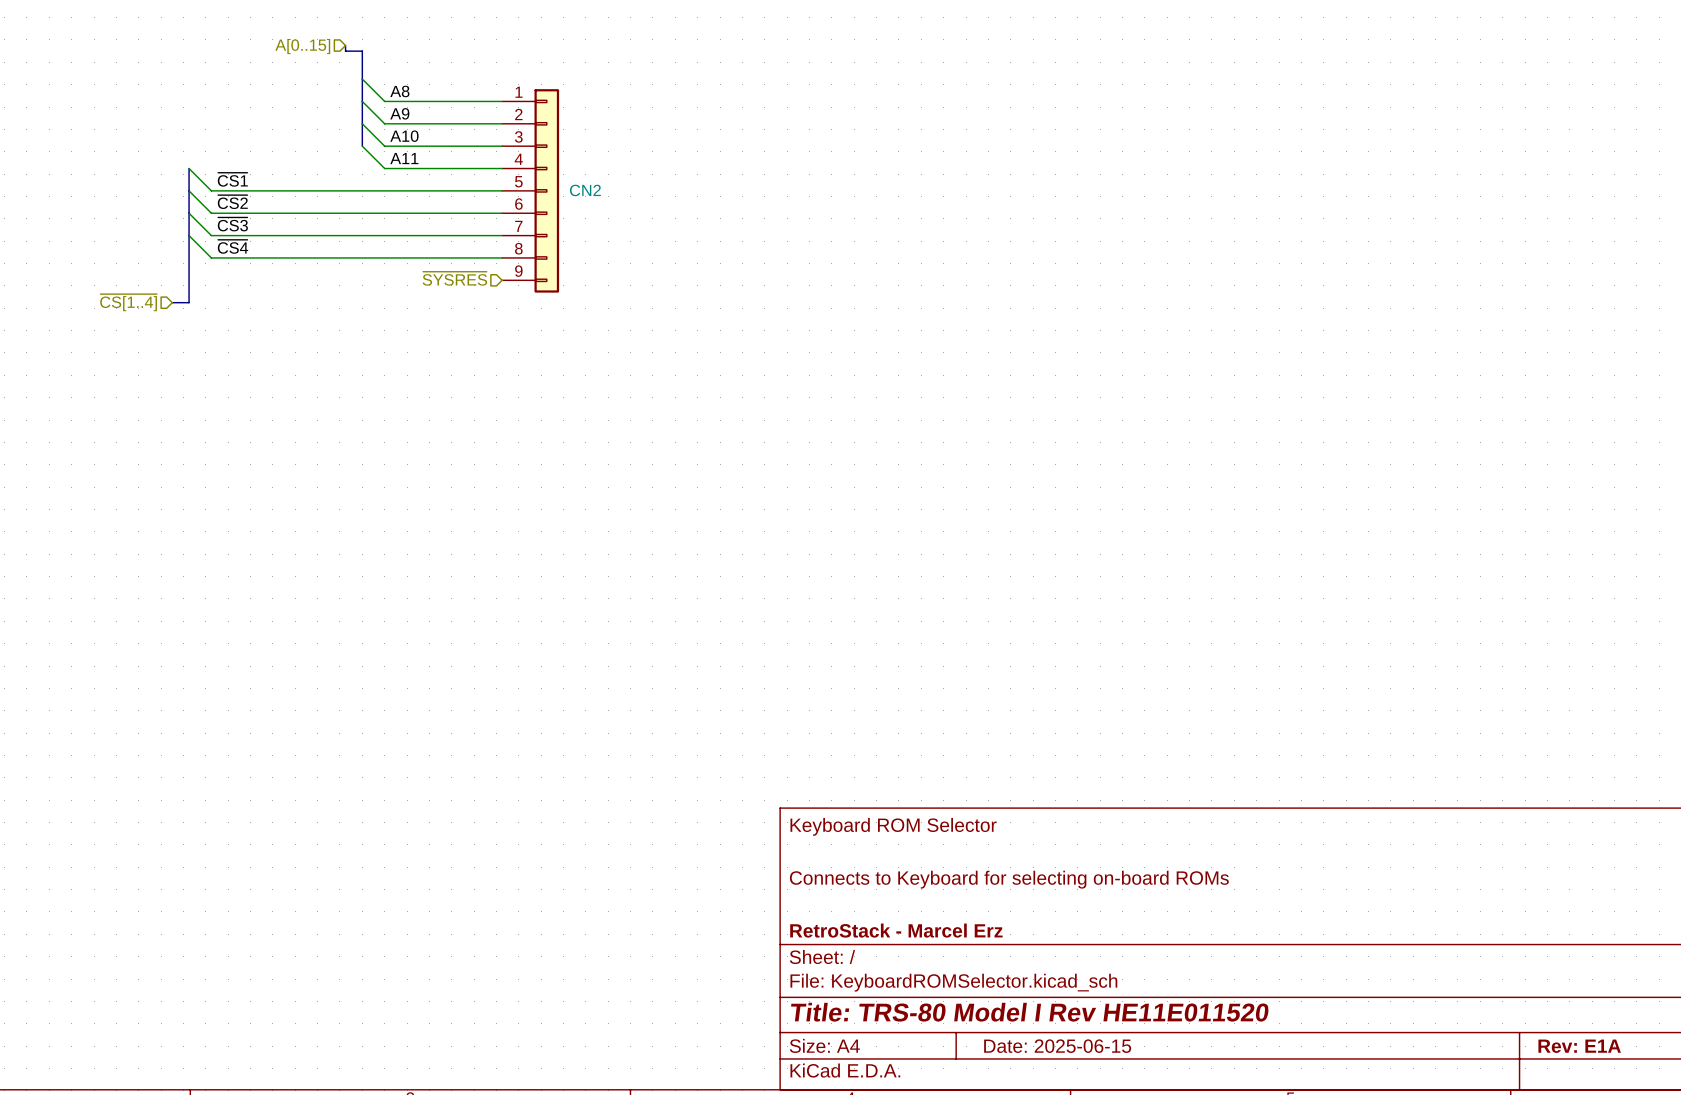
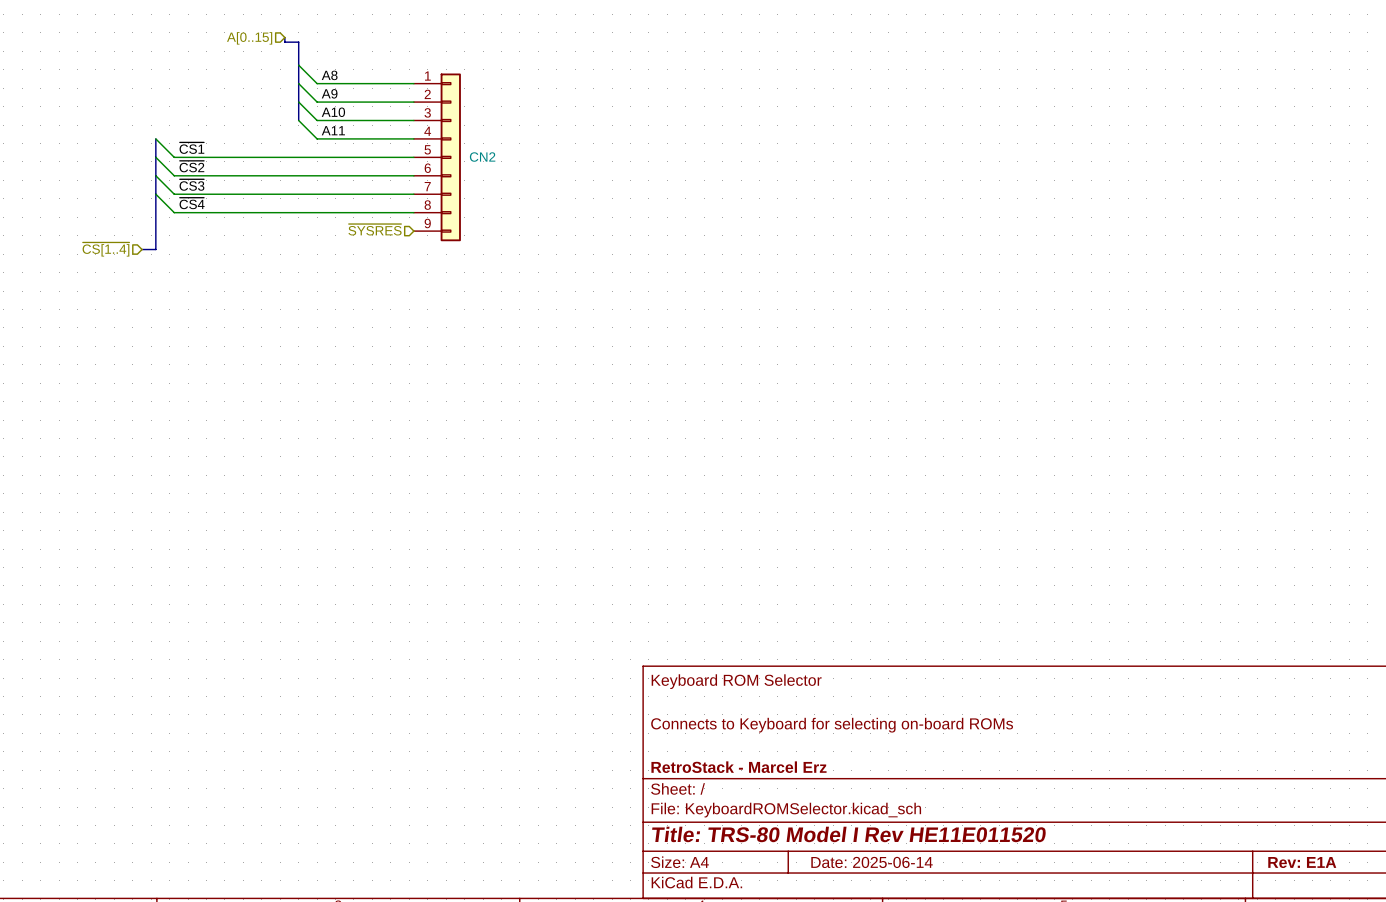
title block: Date: 2025-06-15 (1057, 1046) -> Date: 2025-06-14 (872, 862)

